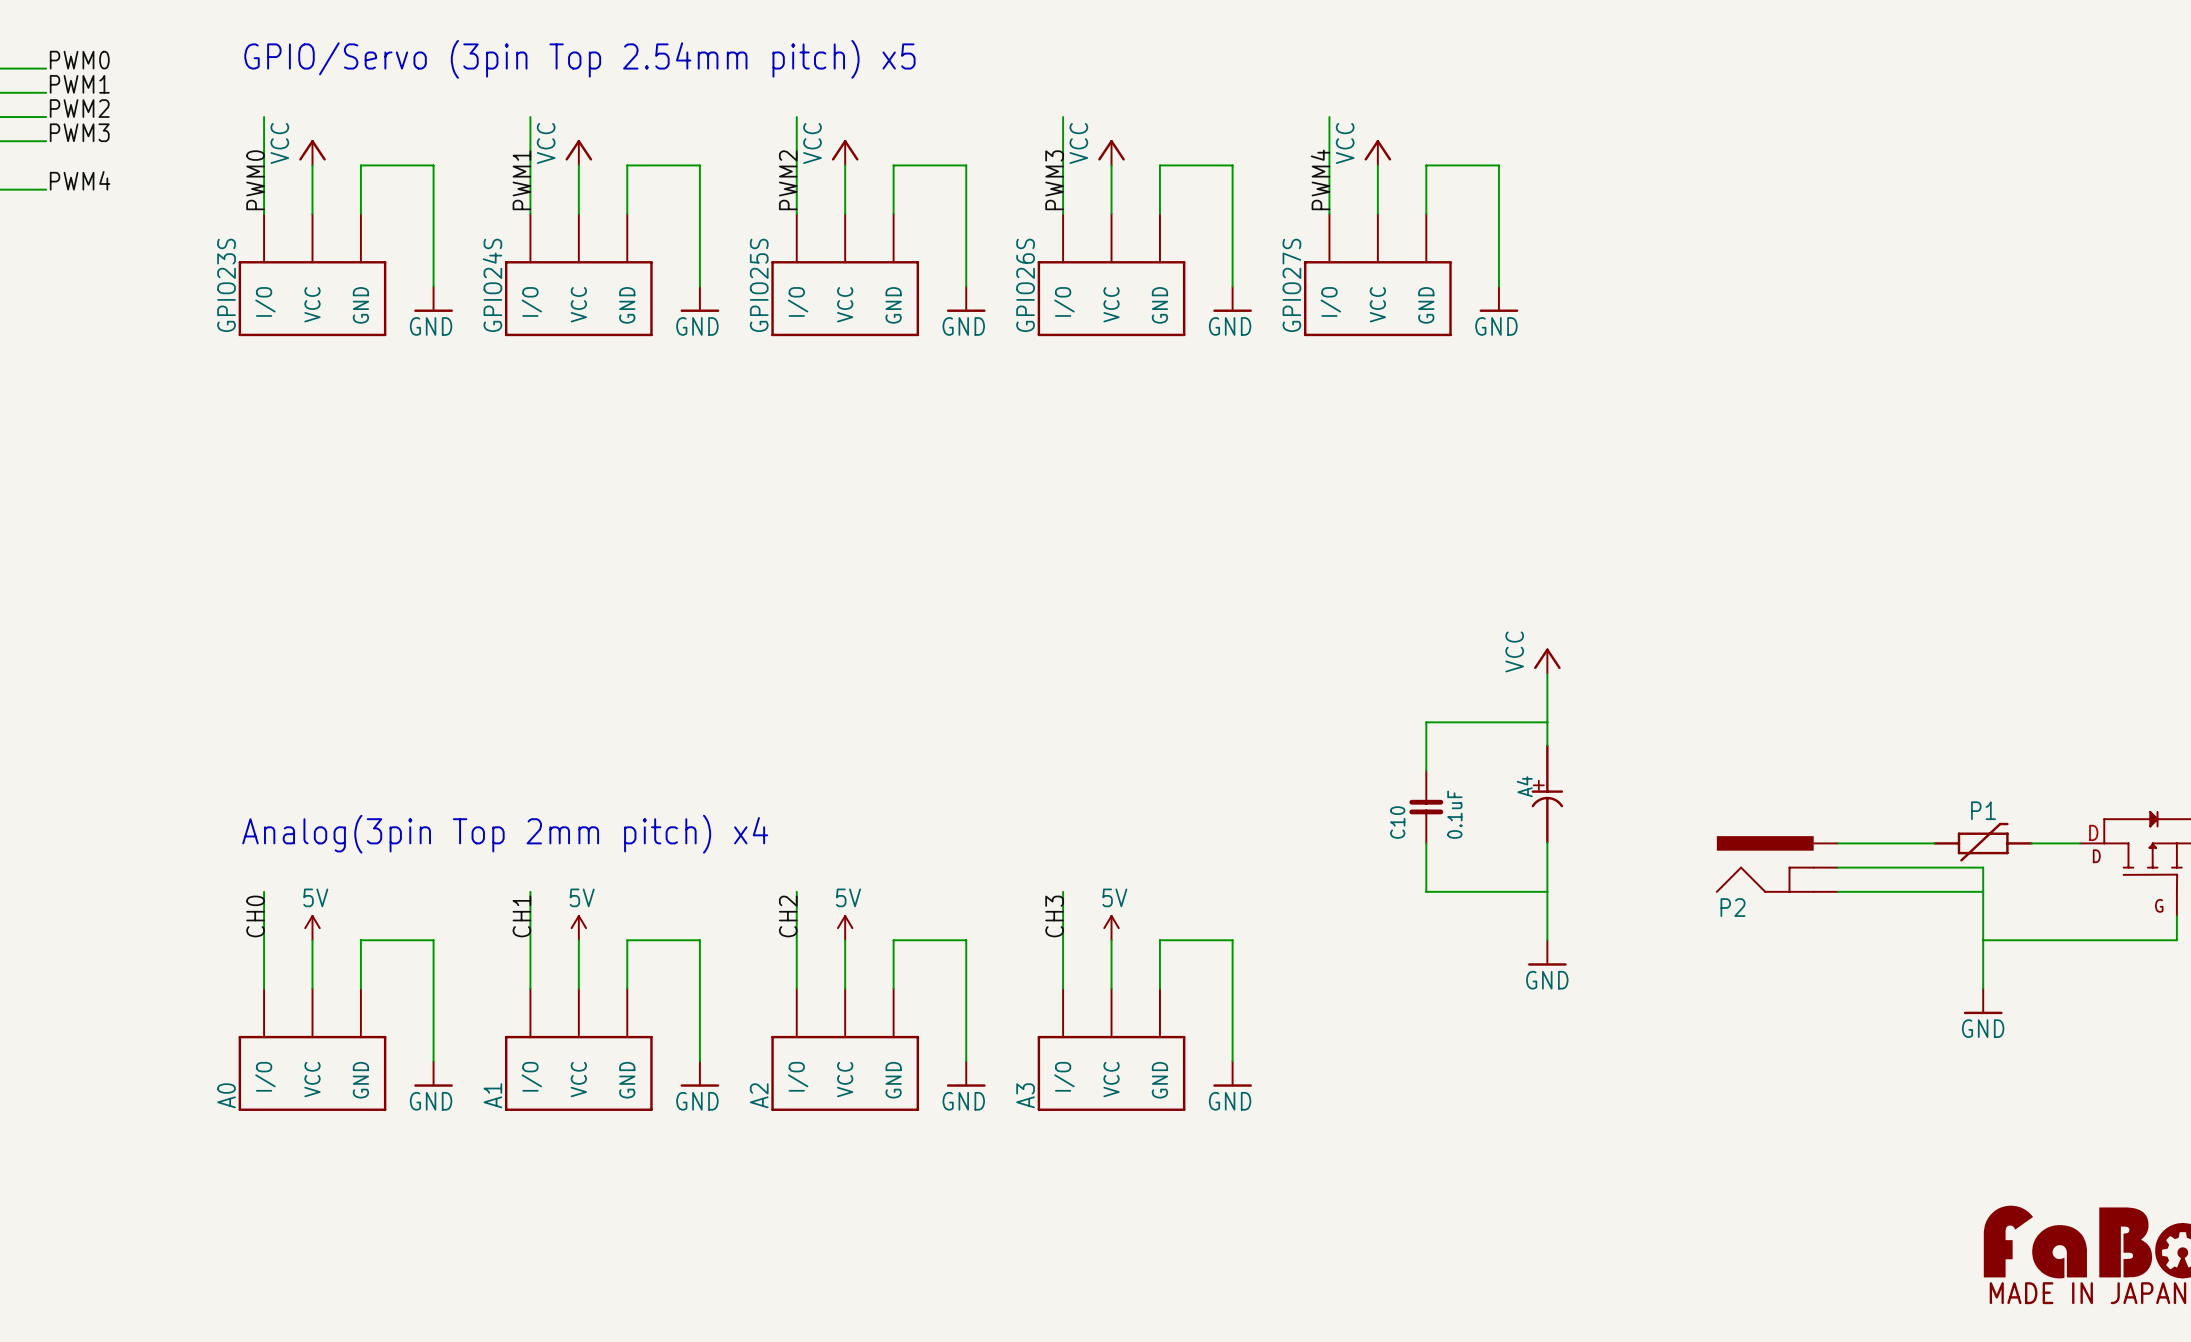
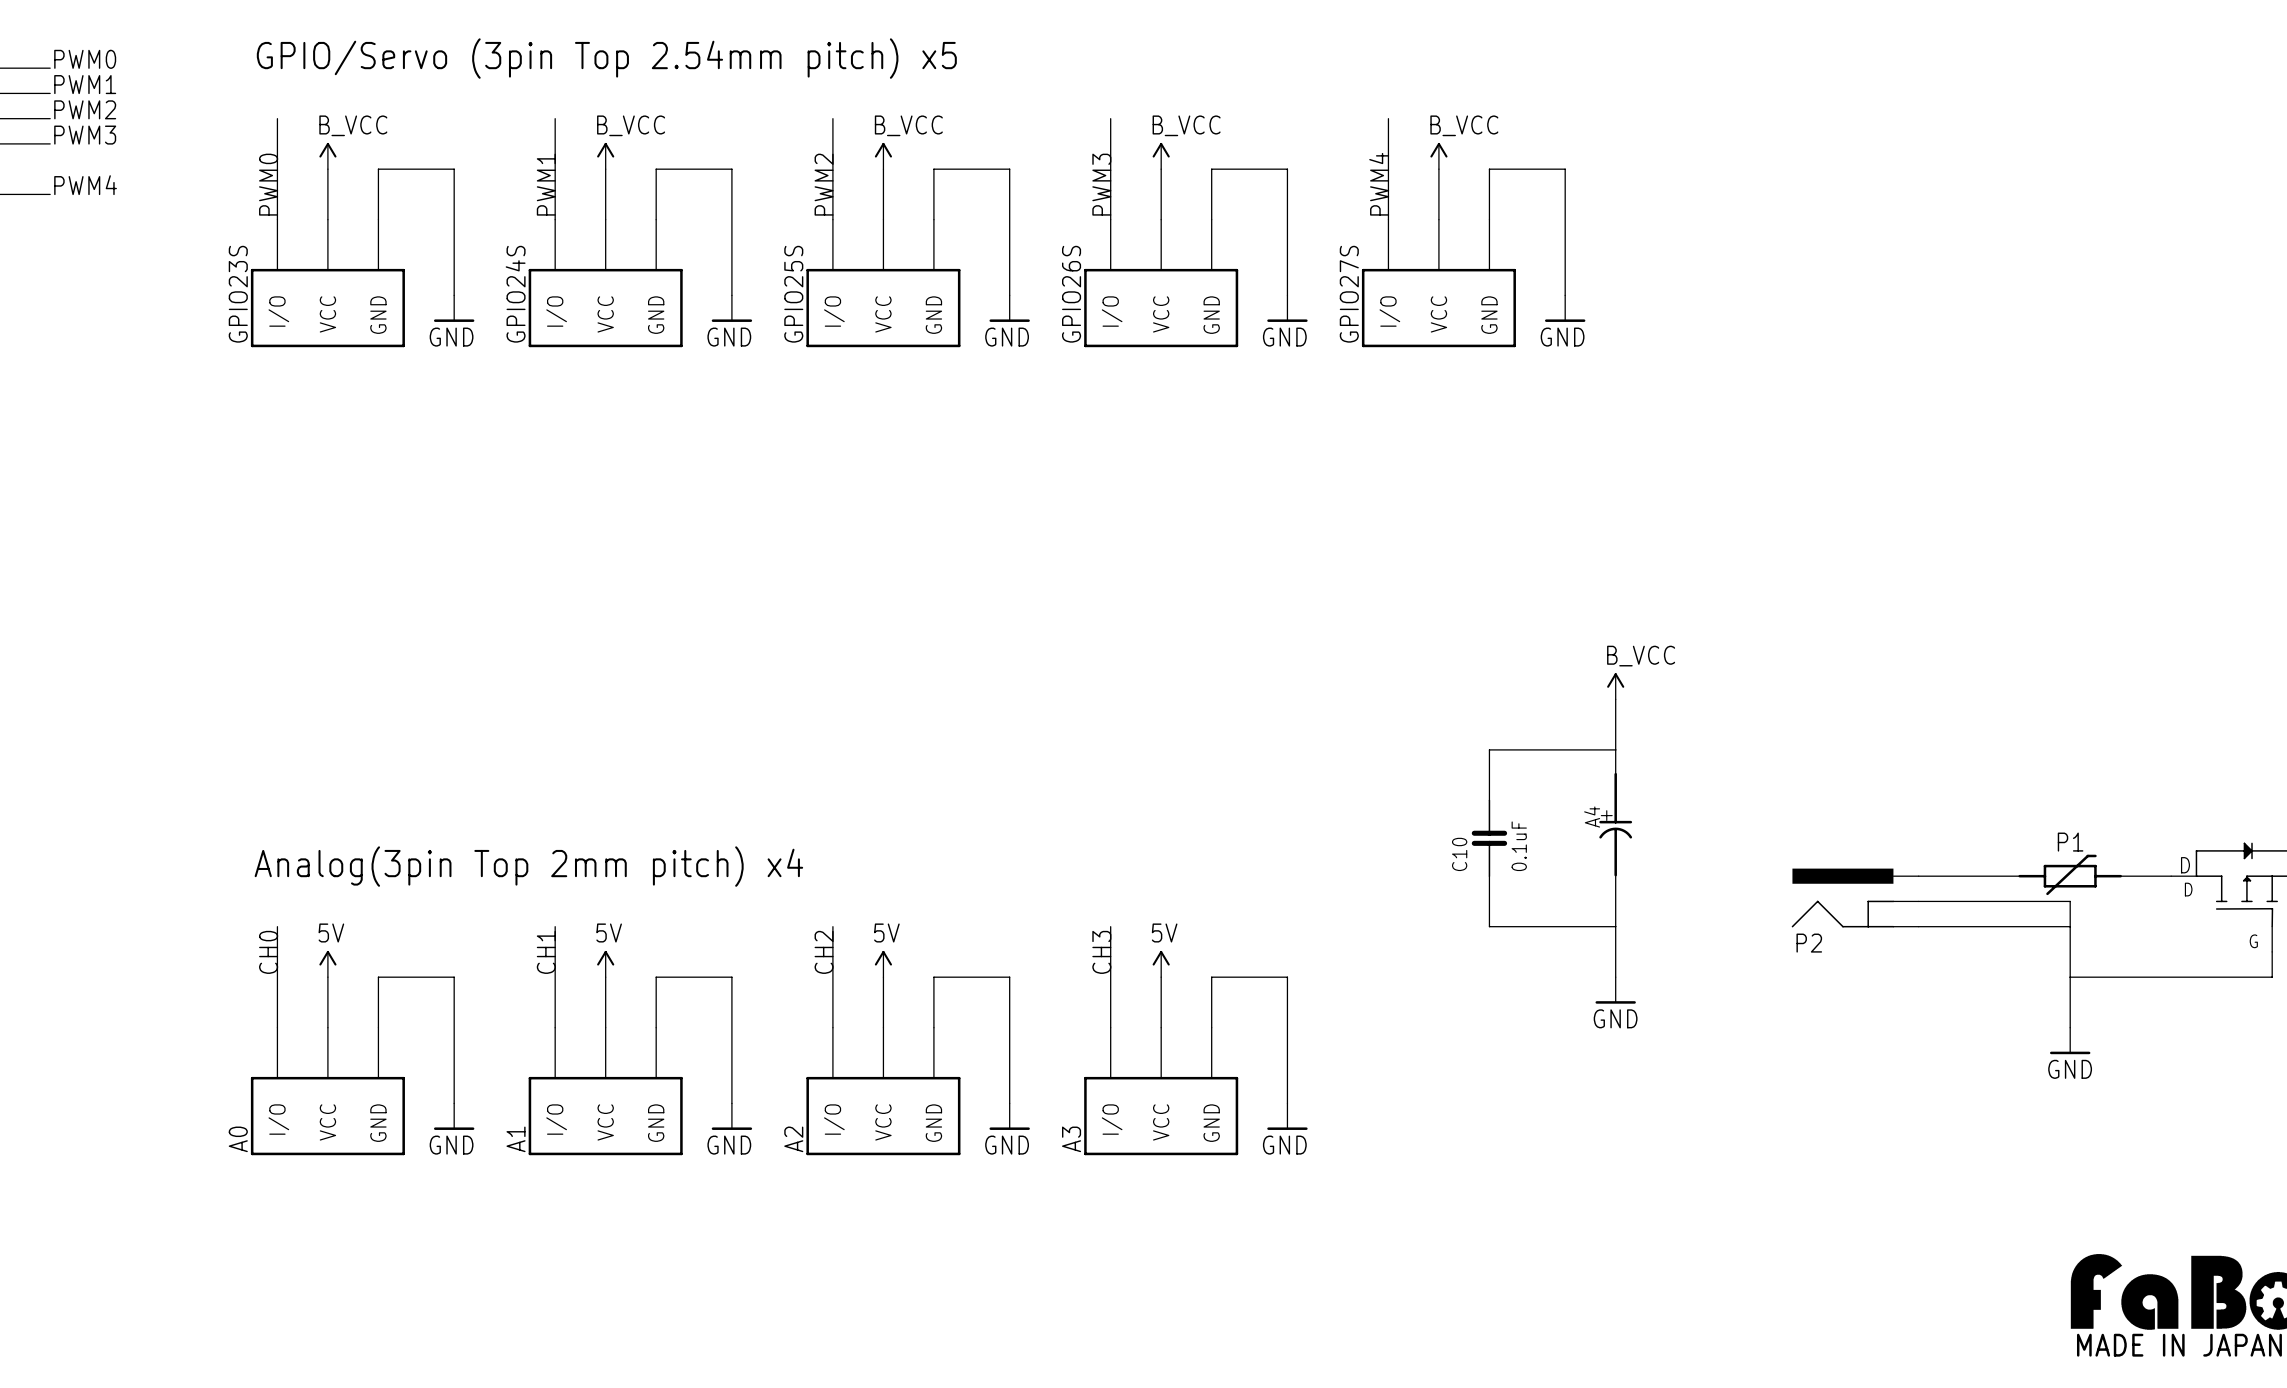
power symbol: VCC (312, 152) -> B_VCC (327, 156)
power symbol: VCC (578, 152) -> B_VCC (605, 156)
power symbol: VCC (845, 152) -> B_VCC (883, 156)
power symbol: VCC (1111, 152) -> B_VCC (1161, 156)
power symbol: VCC (1377, 152) -> B_VCC (1438, 156)
power symbol: VCC (1547, 661) -> B_VCC (1615, 686)

